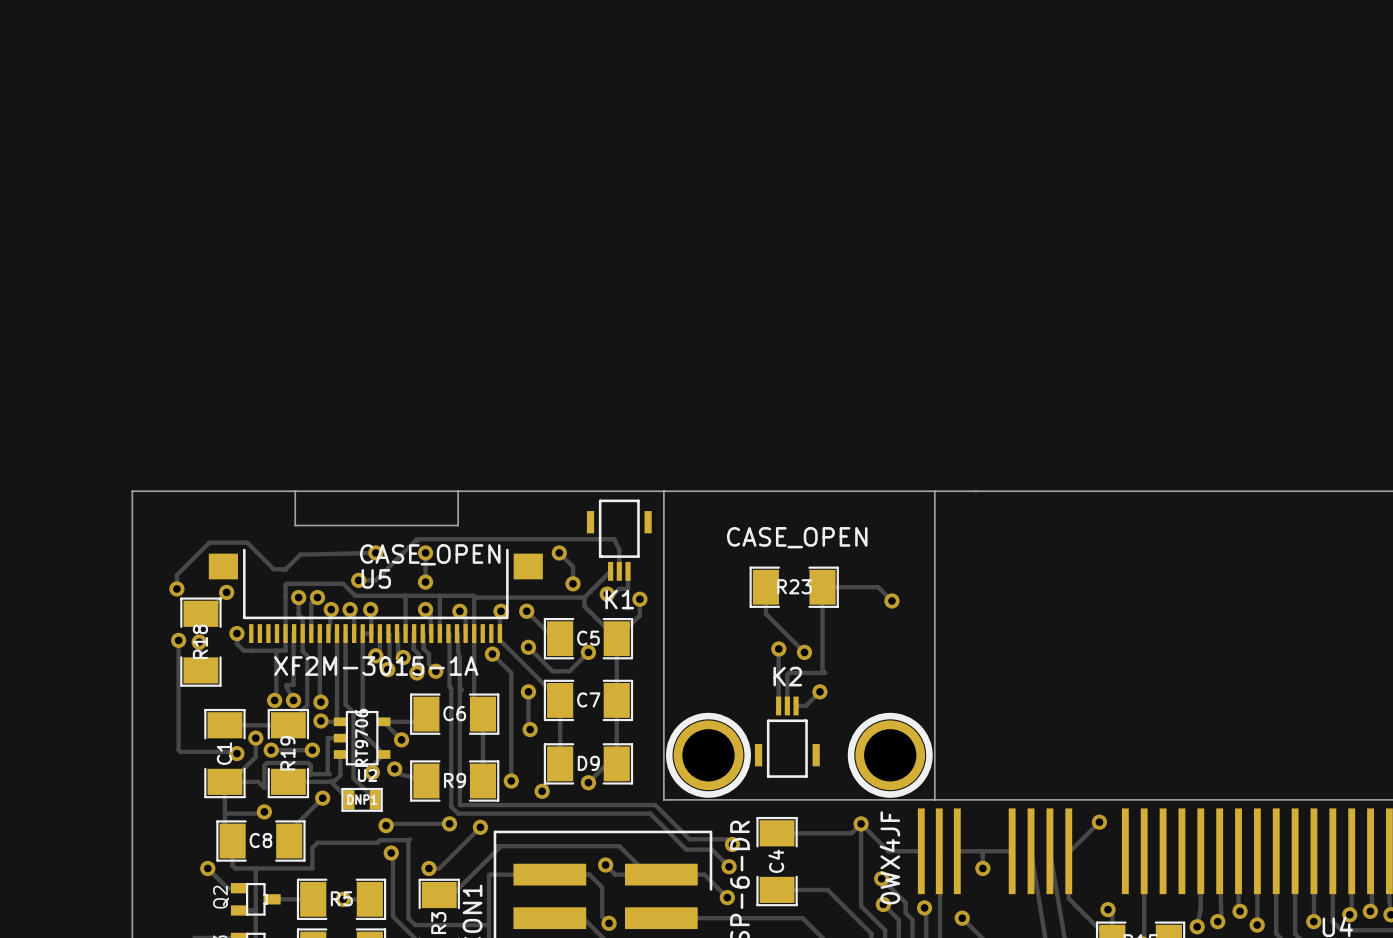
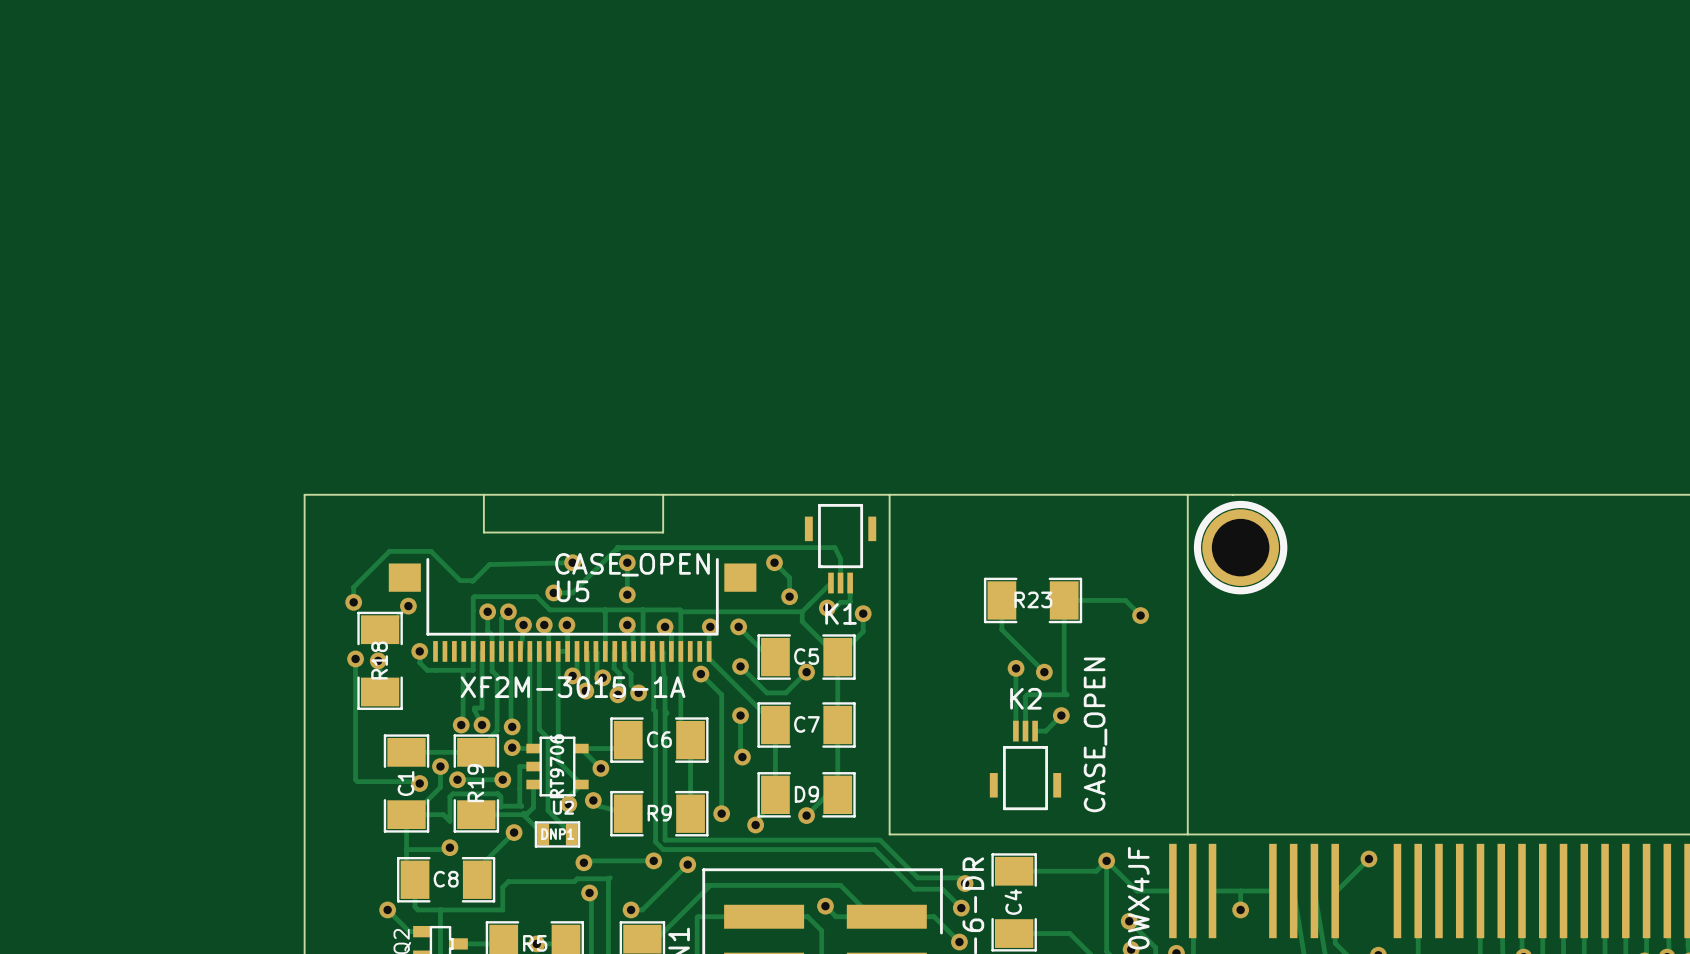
K2 value rotation: 0° (797, 537) -> 90° counterclockwise (1095, 734)
K2 value position: CASE_OPEN (797, 537) -> CASE_OPEN (1095, 734)
part: none -> (1240, 547)
part: (708, 755) -> none
part: (890, 755) -> none

